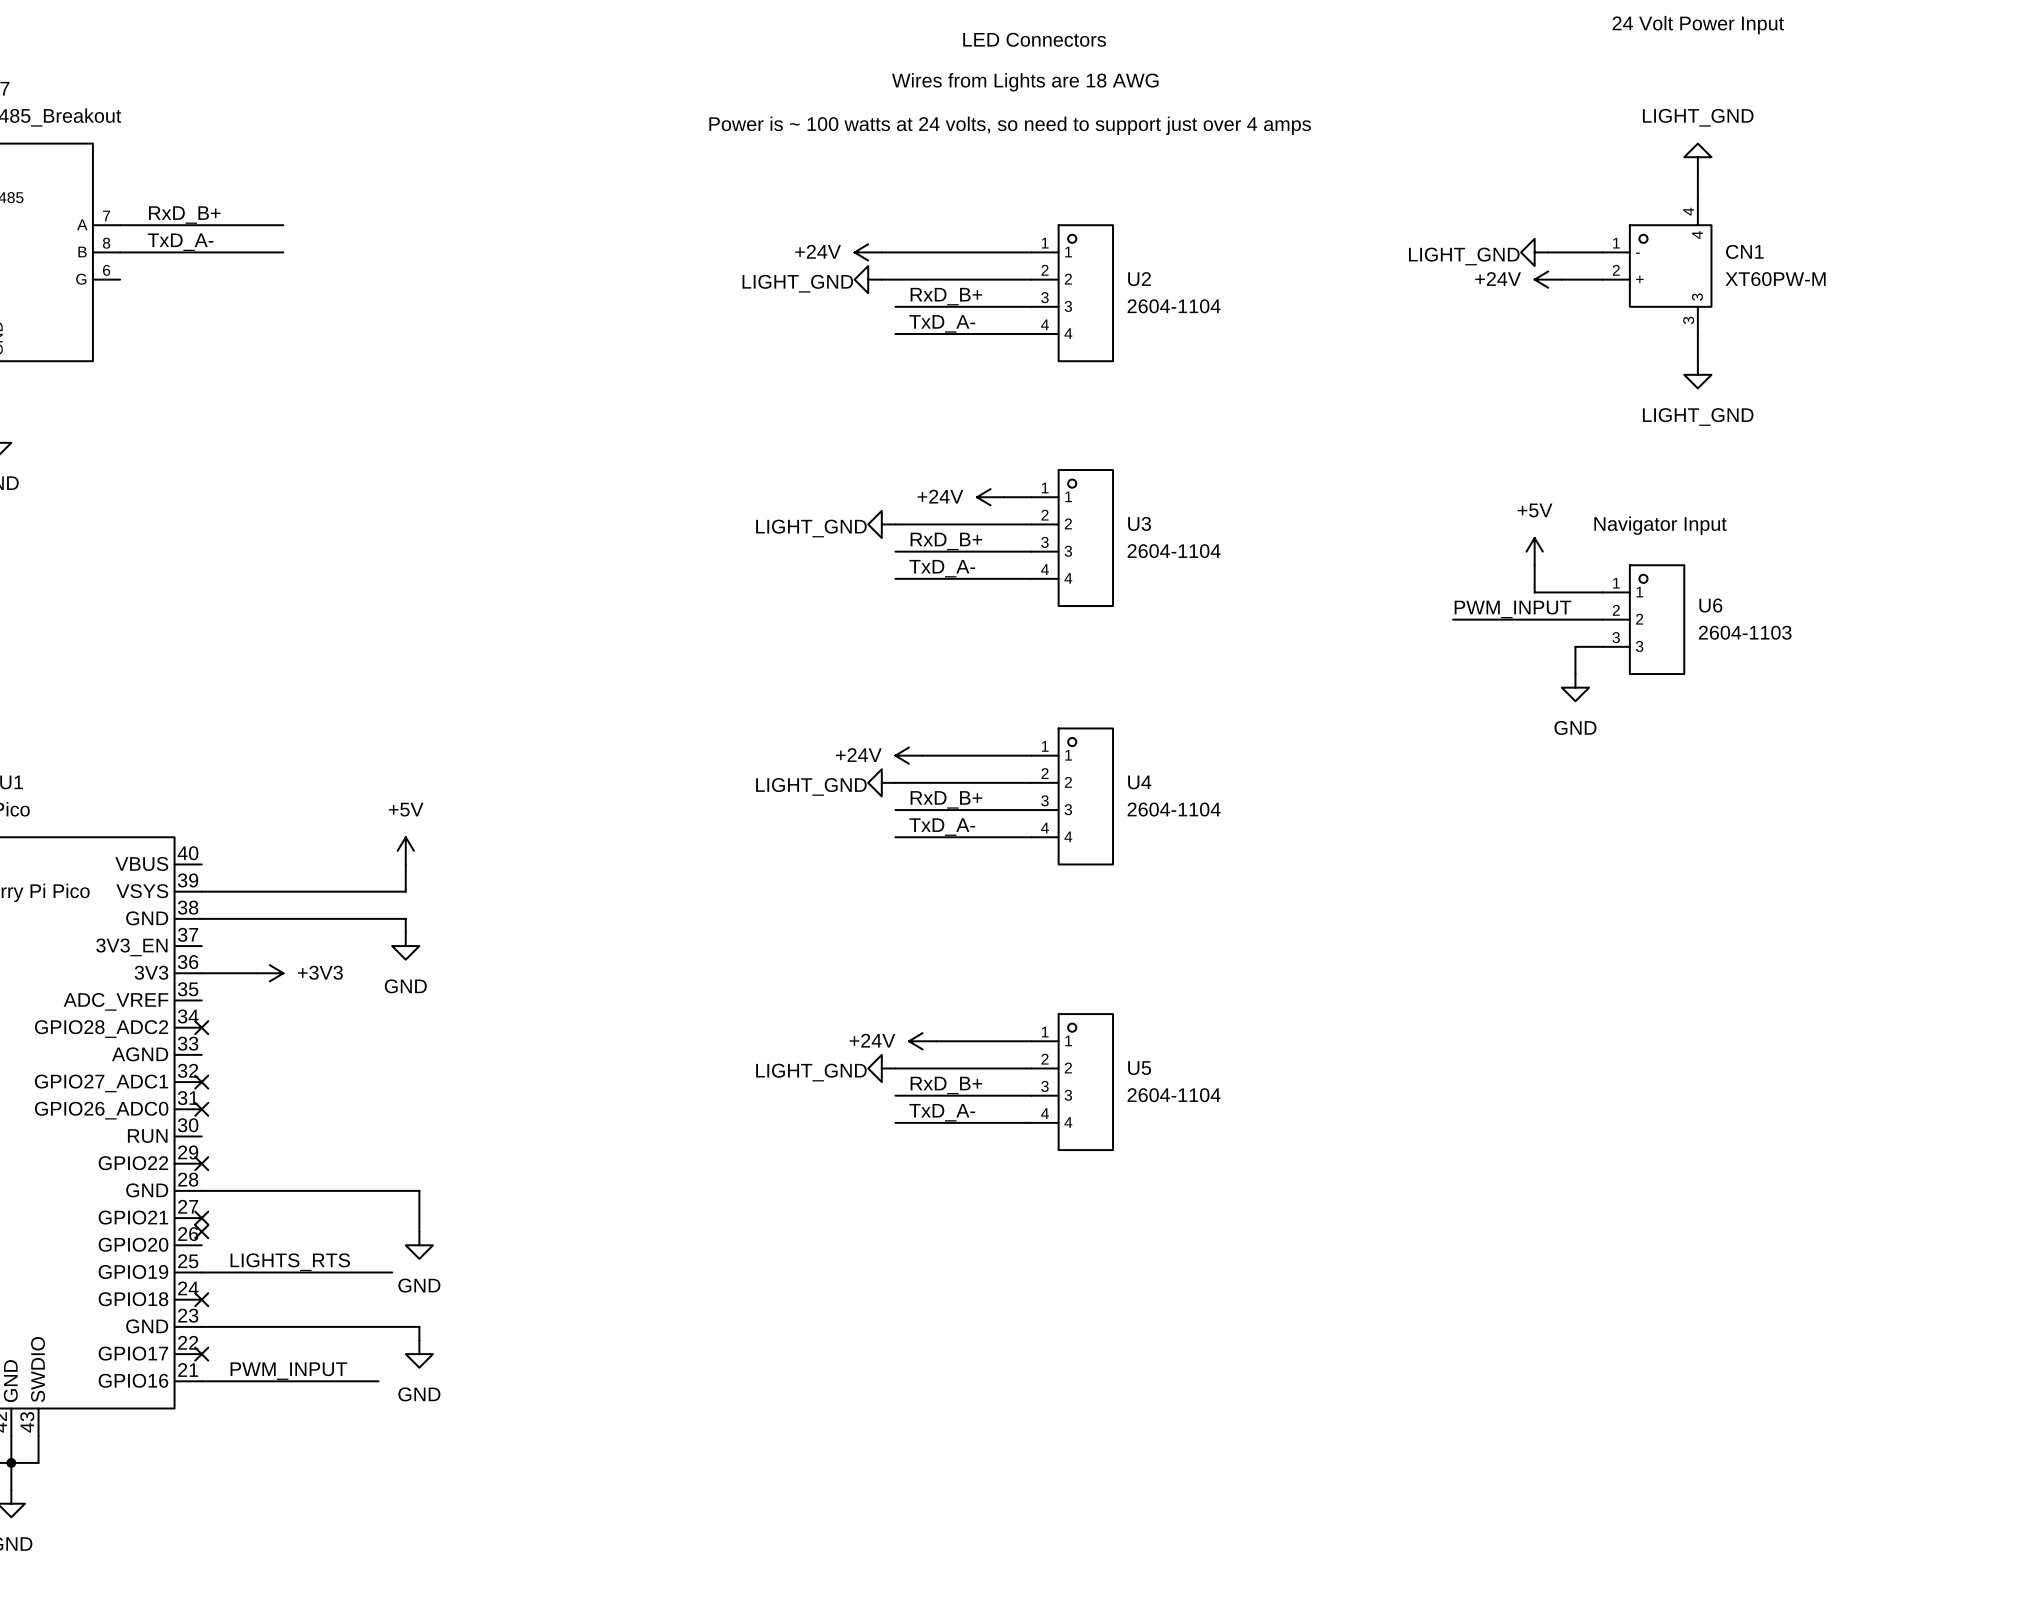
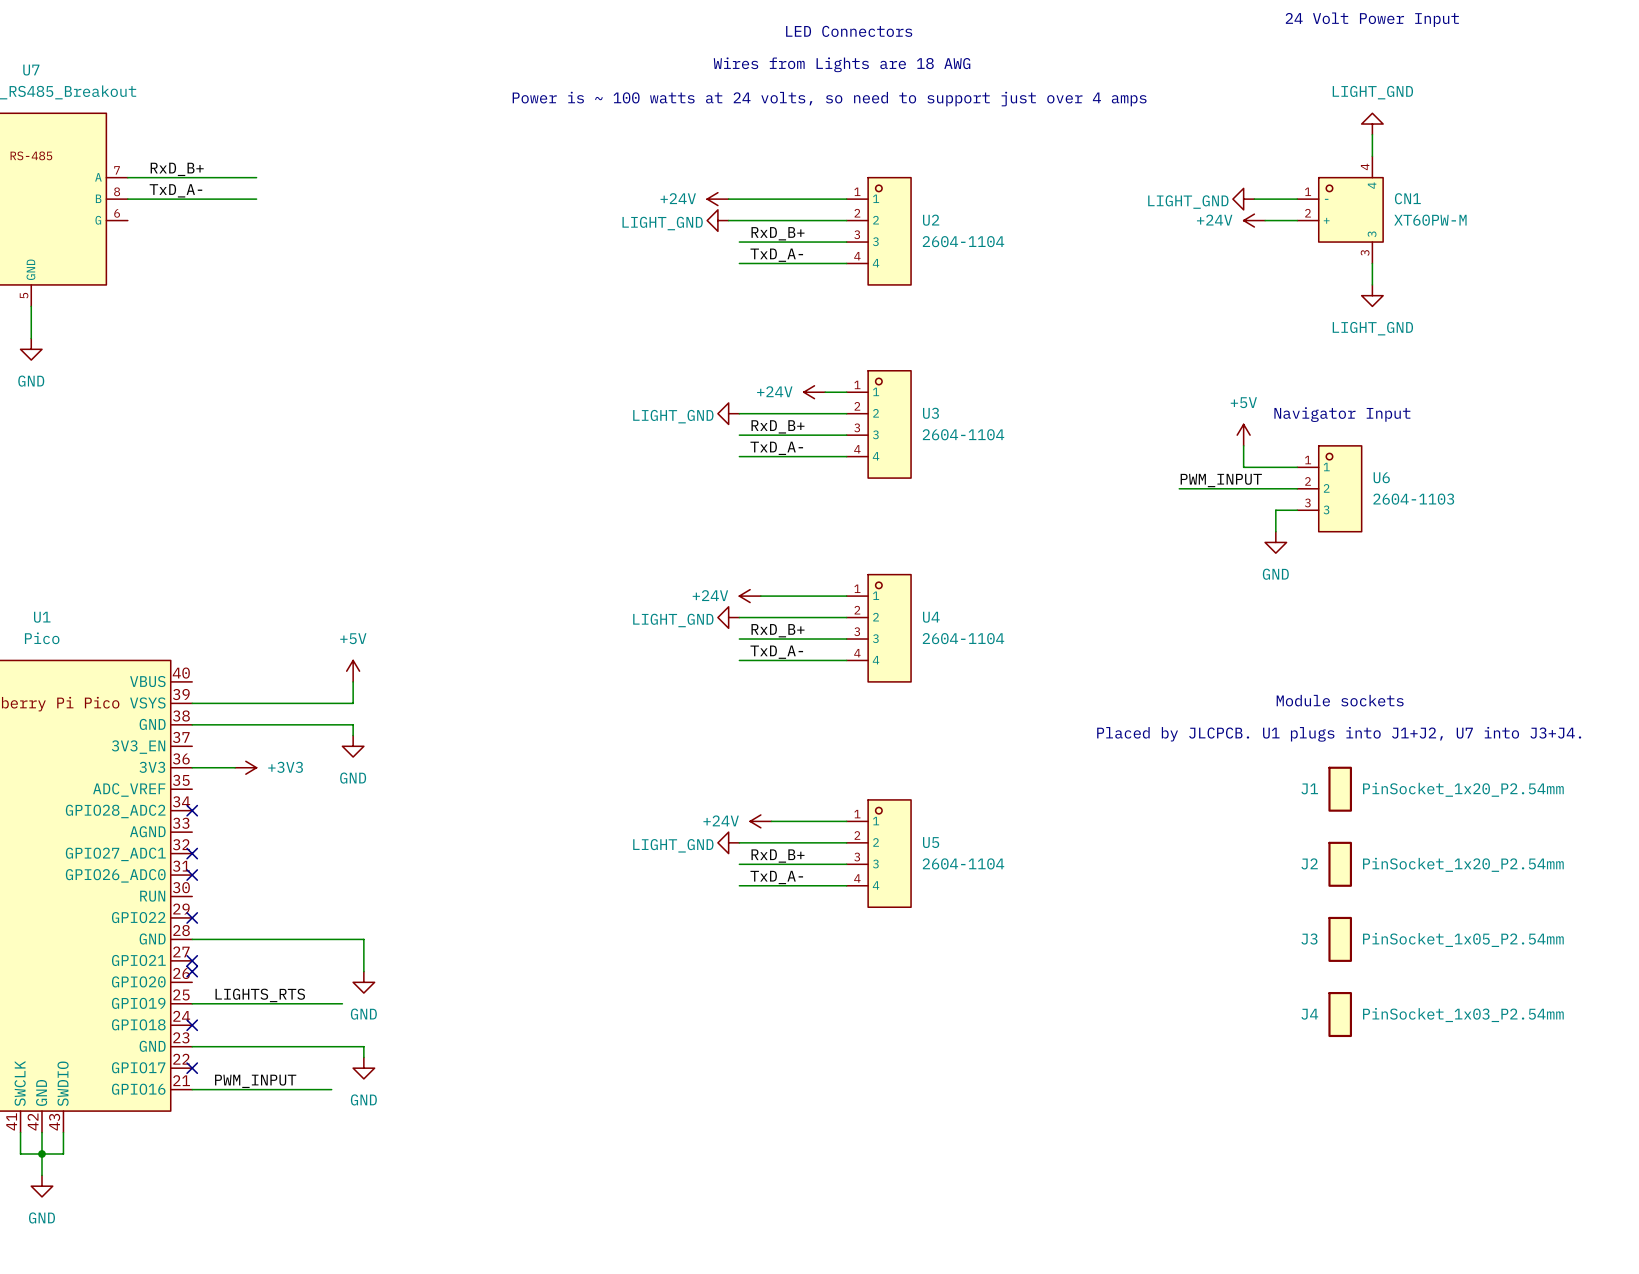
text: none -> Module sockets (1340, 700)
text: none -> Placed by JLCPCB. U1 plugs into J1+J2, U7 into J3+J4. (1339, 734)
J1: none -> PinSocket_1x20_P2.54mm (1340, 789)
J2: none -> PinSocket_1x20_P2.54mm (1340, 864)
J3: none -> PinSocket_1x05_P2.54mm (1340, 939)
J4: none -> PinSocket_1x03_P2.54mm (1340, 1014)

